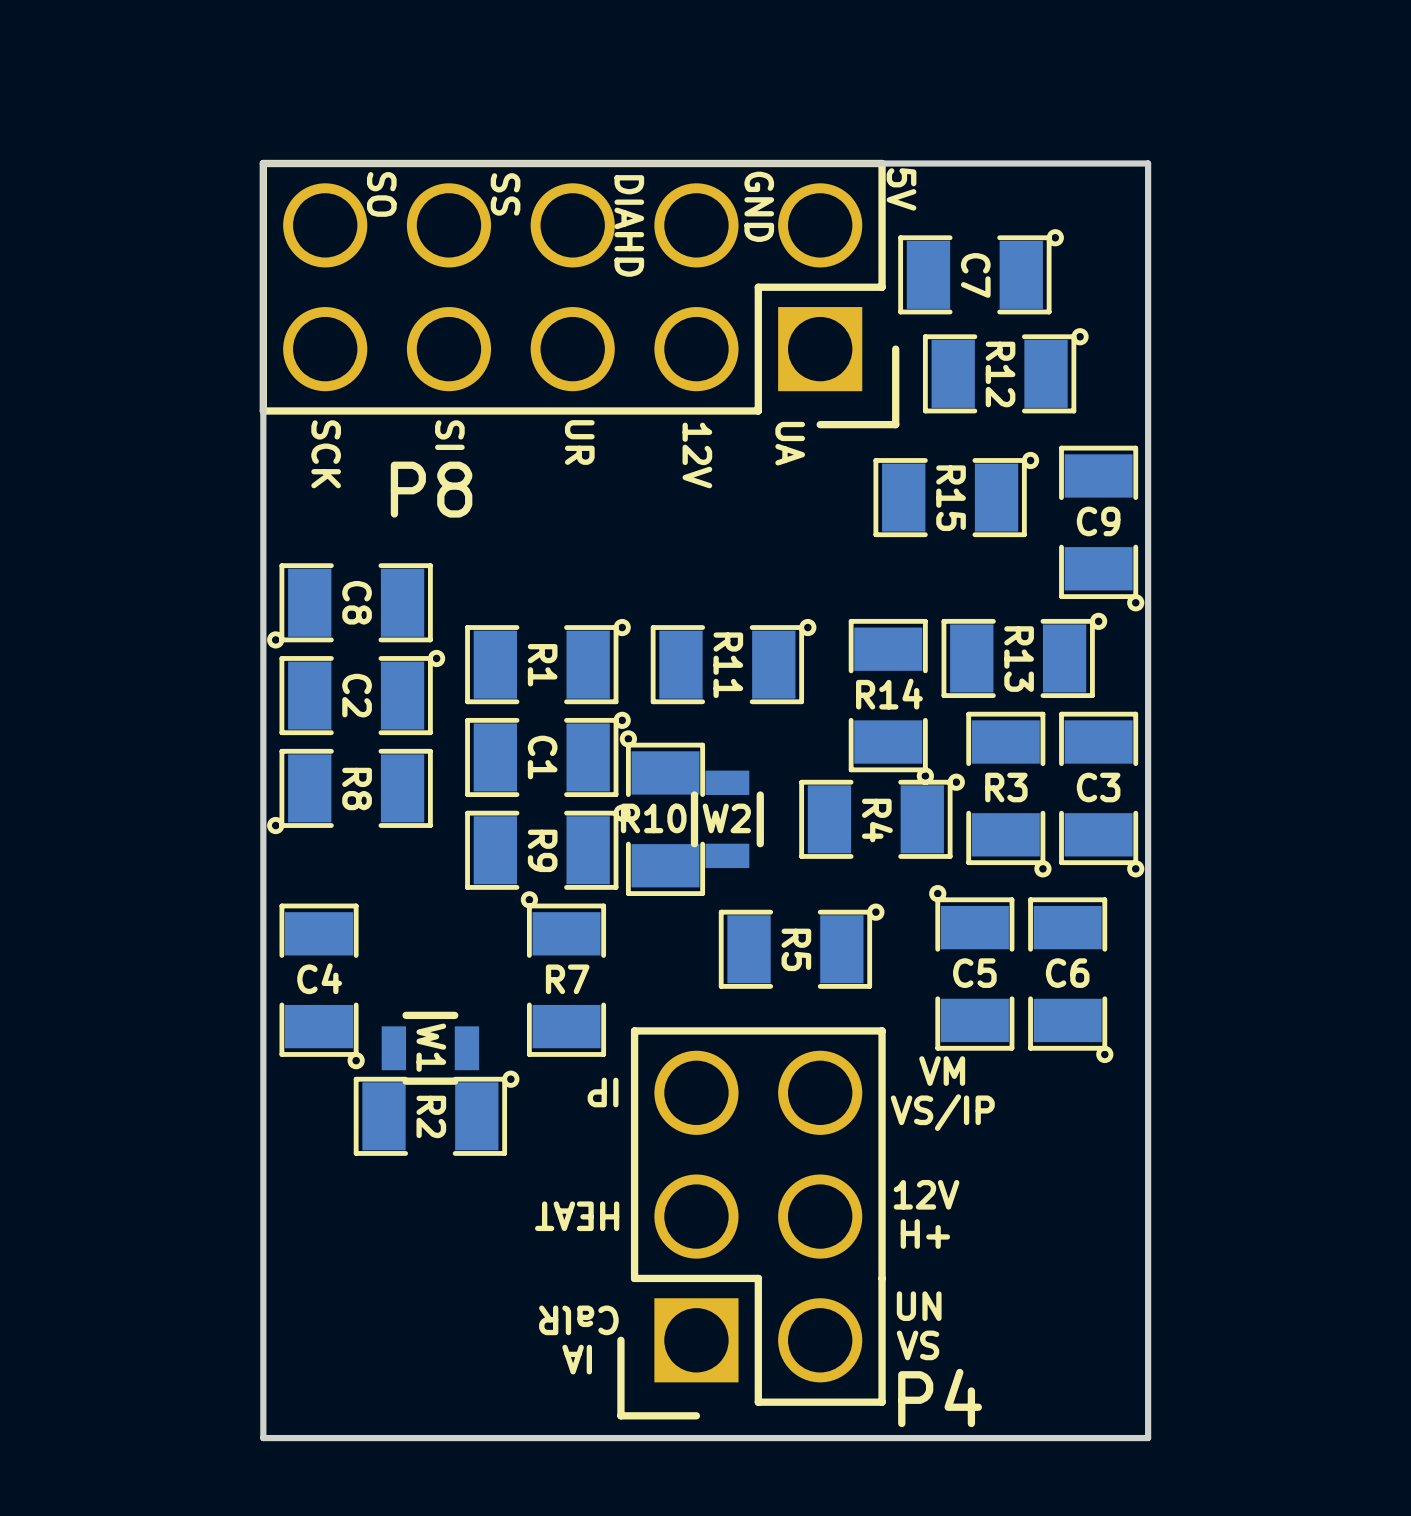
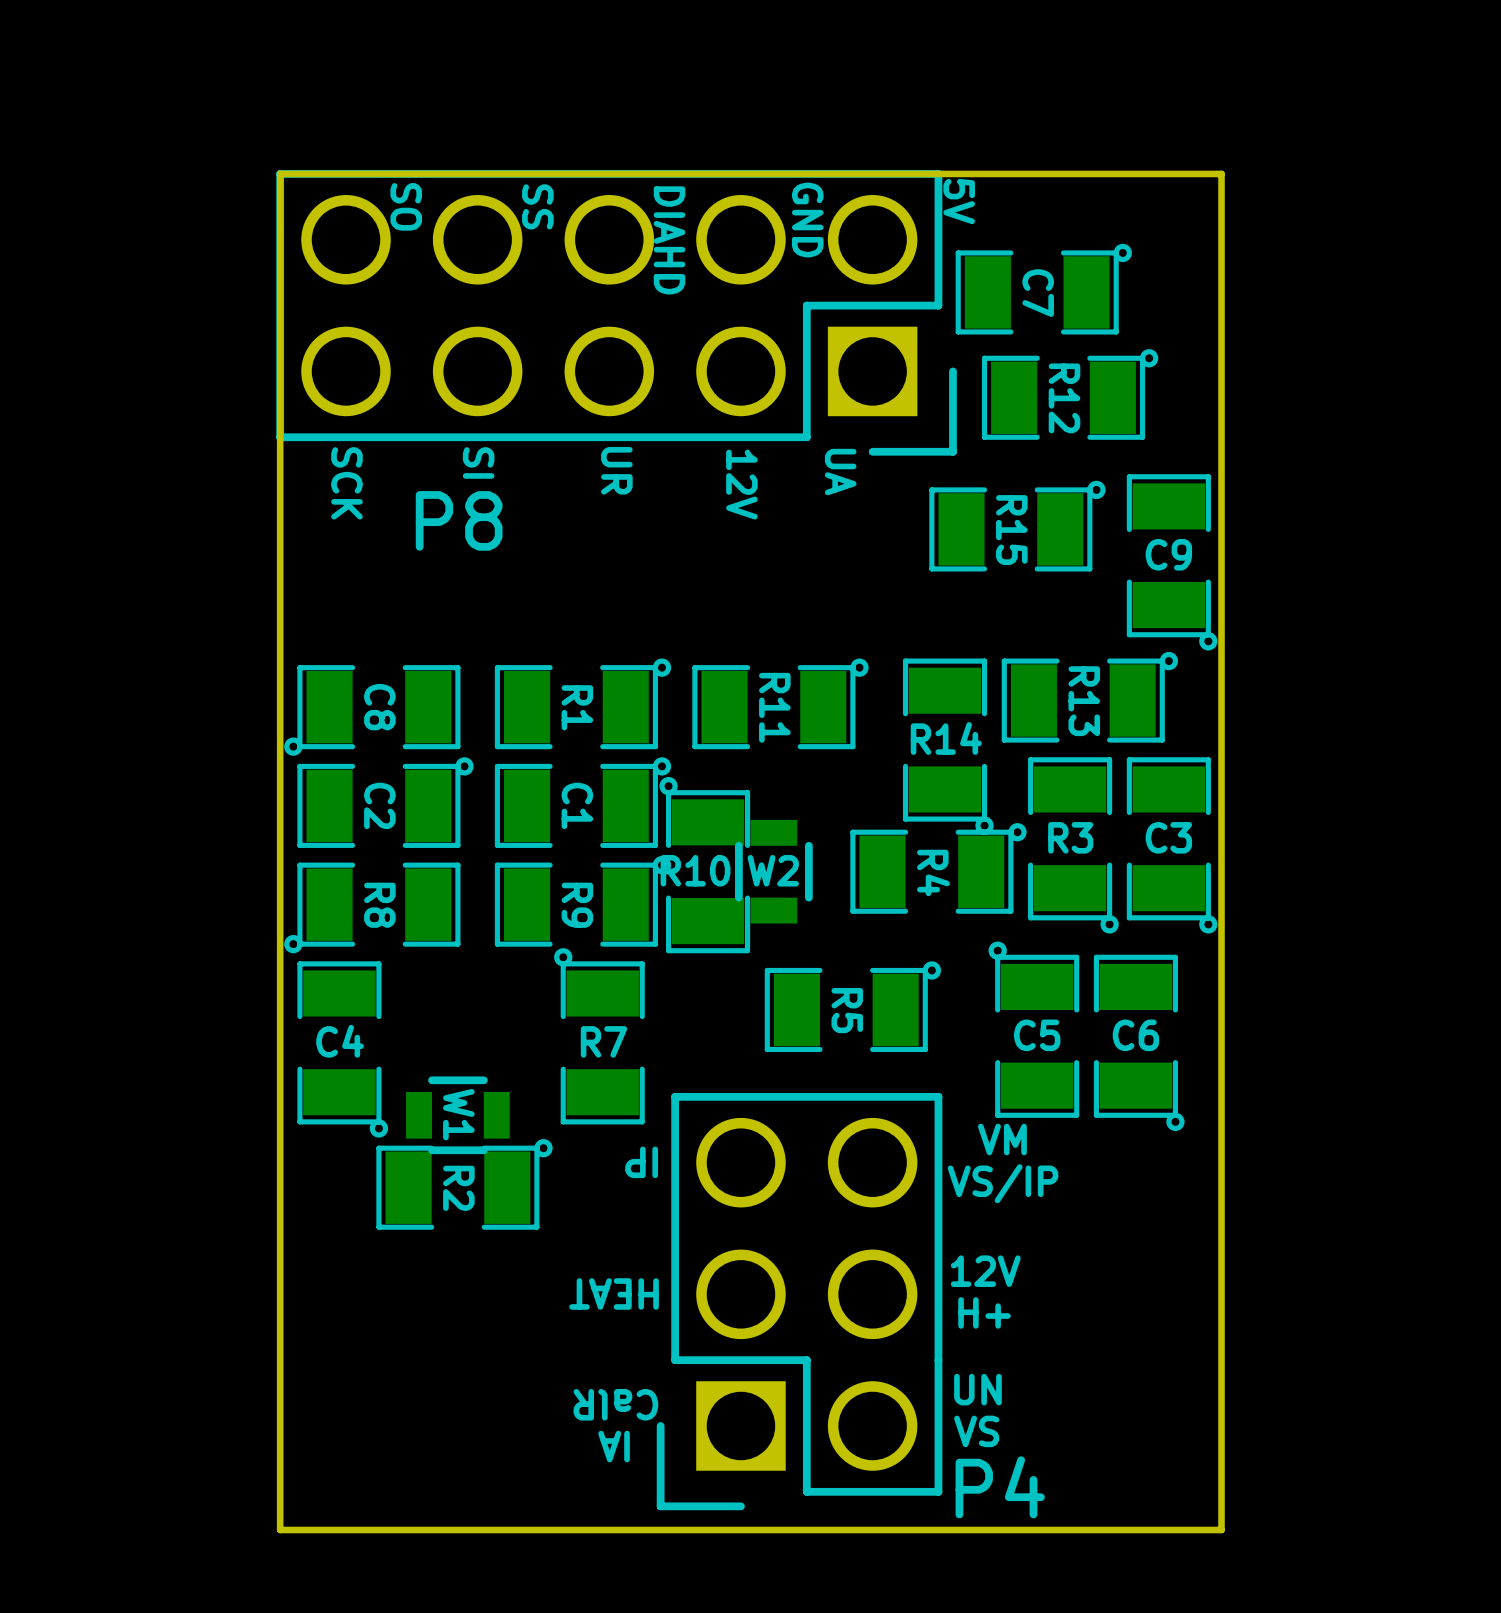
C8 position: (349, 605) -> (372, 710)
C2 position: (362, 692) -> (385, 802)
R8 position: (349, 791) -> (372, 907)

